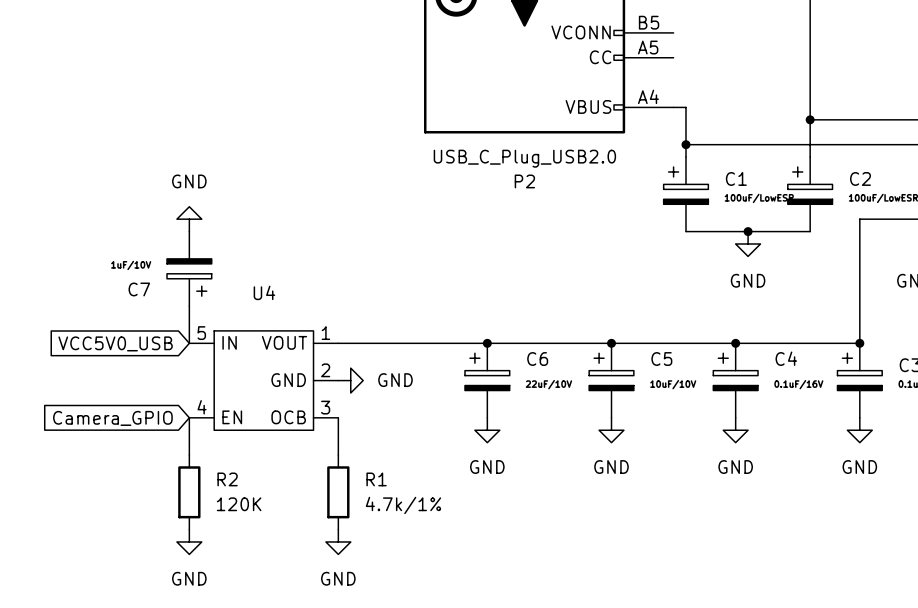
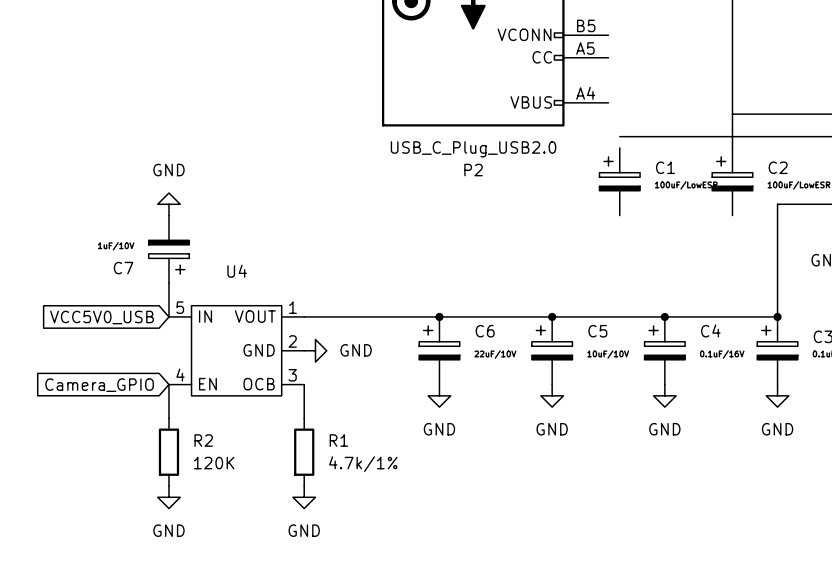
wire: (673, 107) (686, 107) (686, 157) -> none
junction: (810, 119) -> none
junction: (686, 144) -> none
wire: (686, 231) (810, 231) -> none
junction: (748, 231) -> none
power symbol: GND (748, 244) -> none

